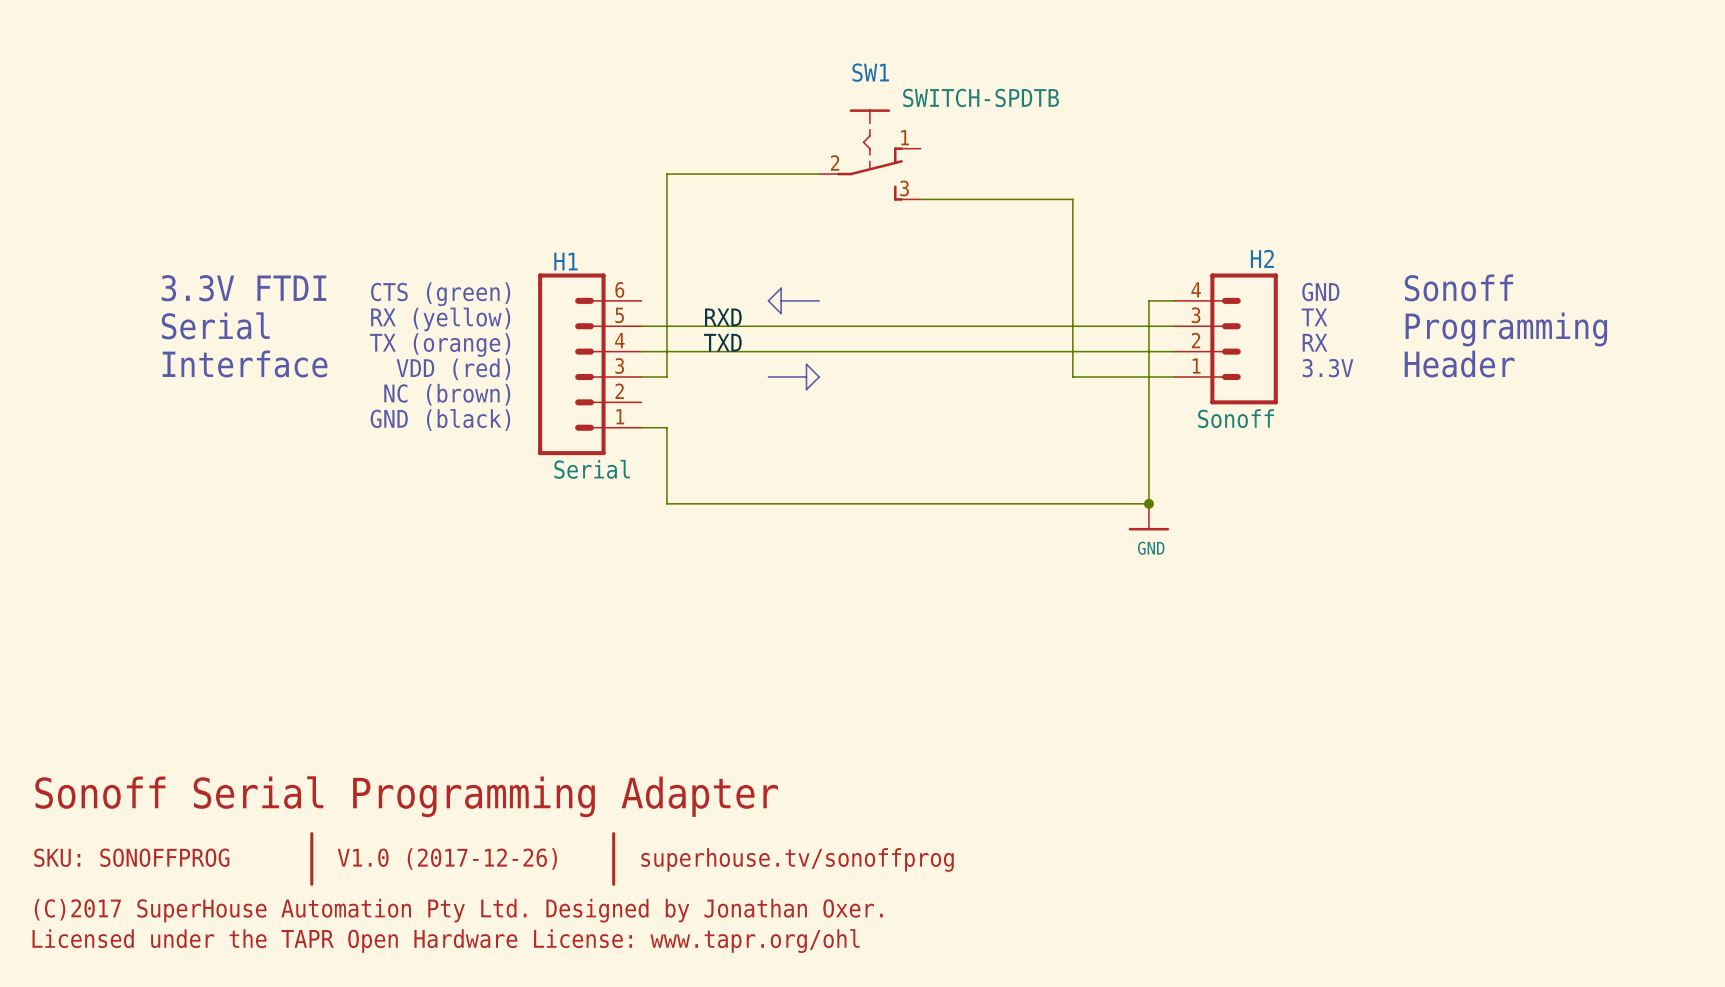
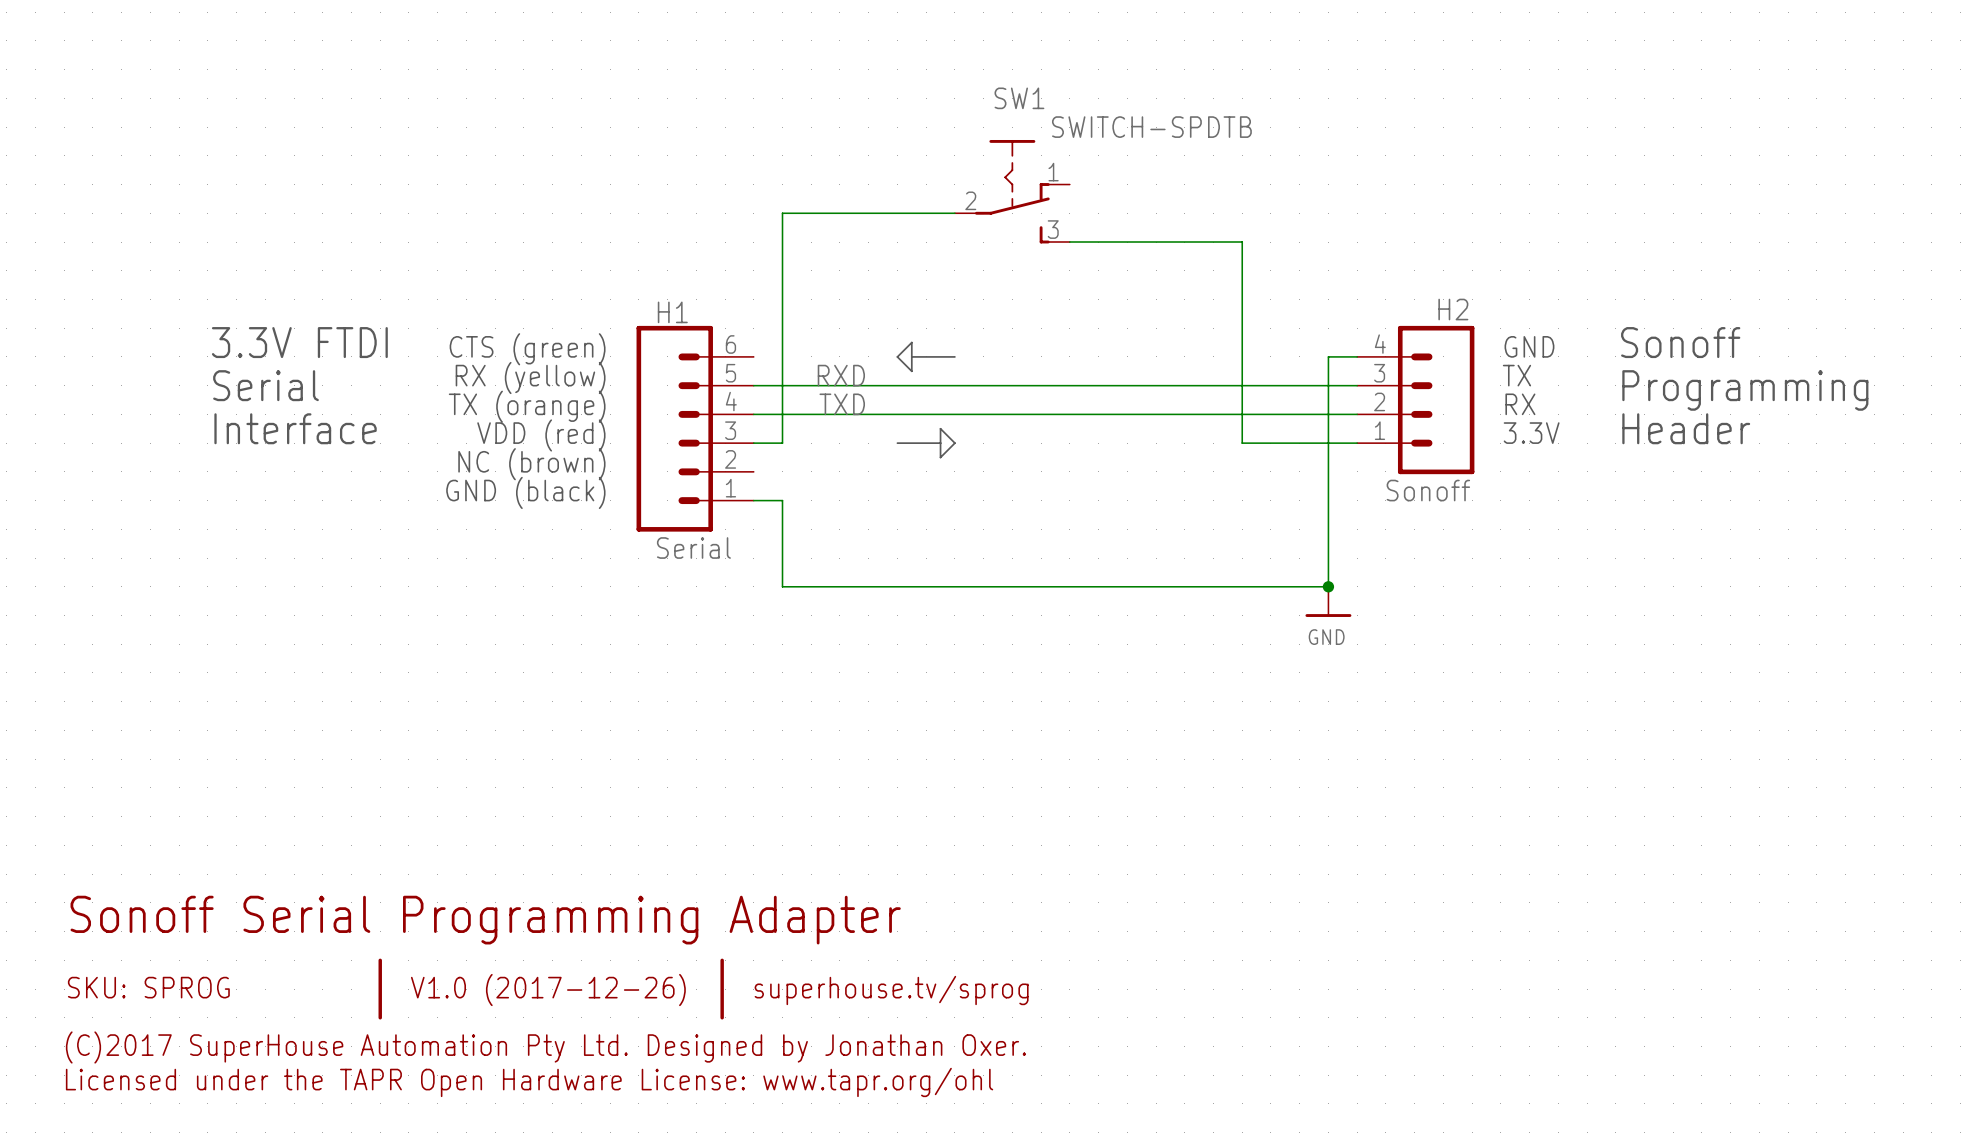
text: SKU: SONOFFPROG (131, 857) -> SKU: SPROG (148, 987)
text: superhouse.tv/sonoffprog (797, 859) -> superhouse.tv/sprog (891, 990)

